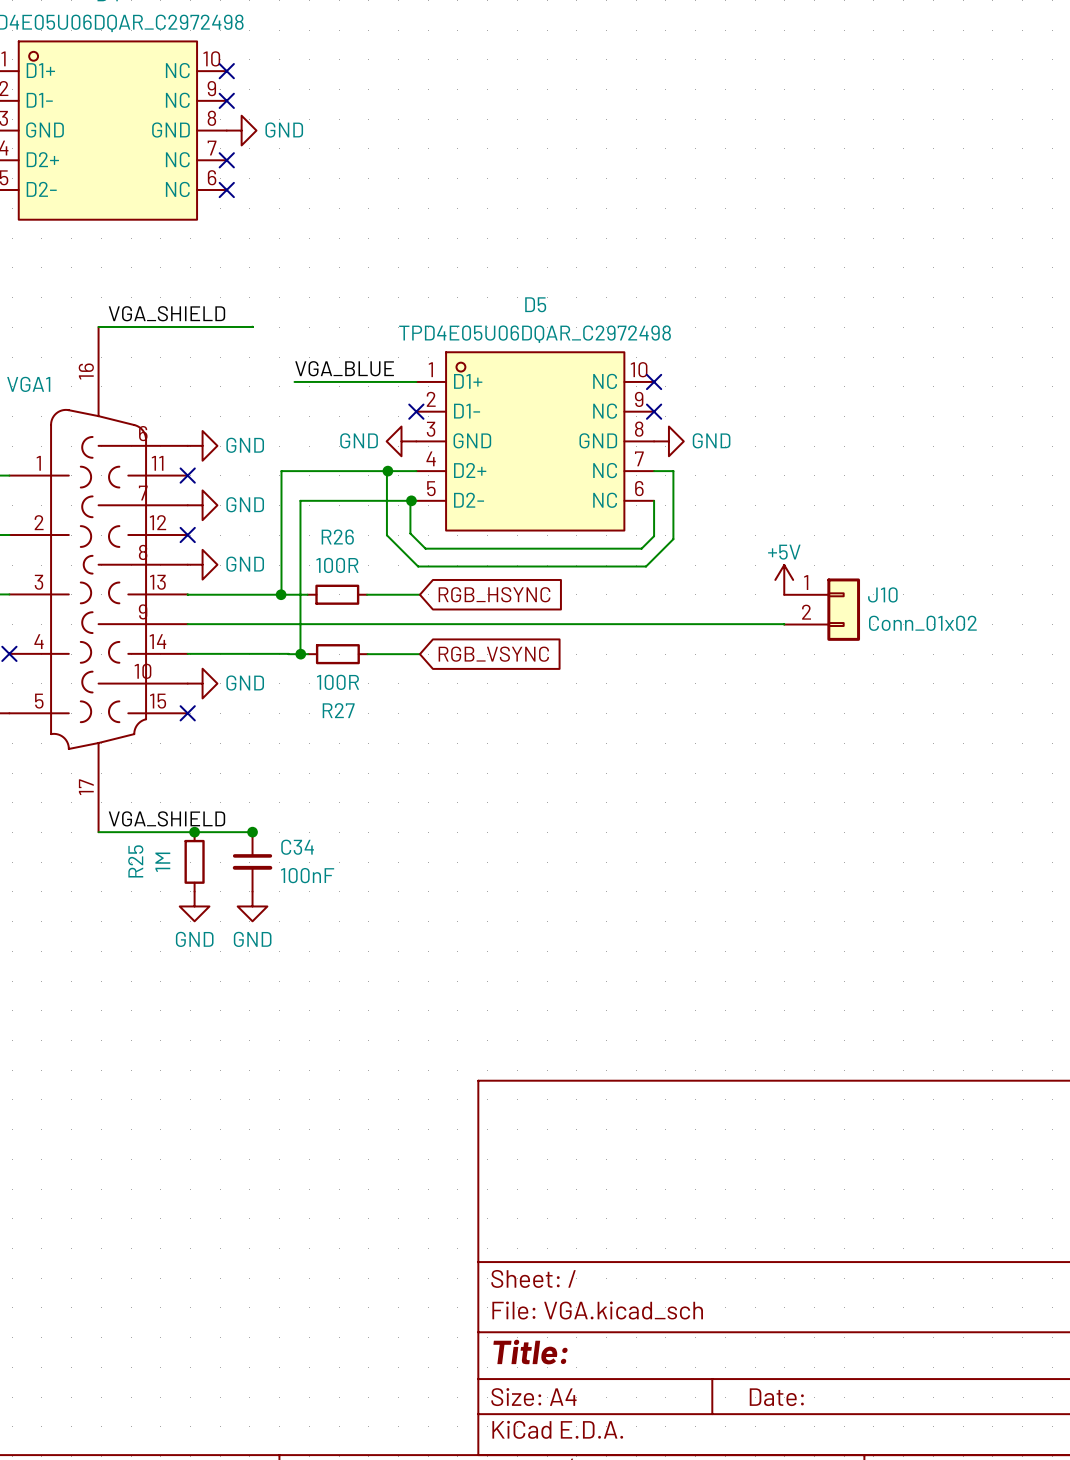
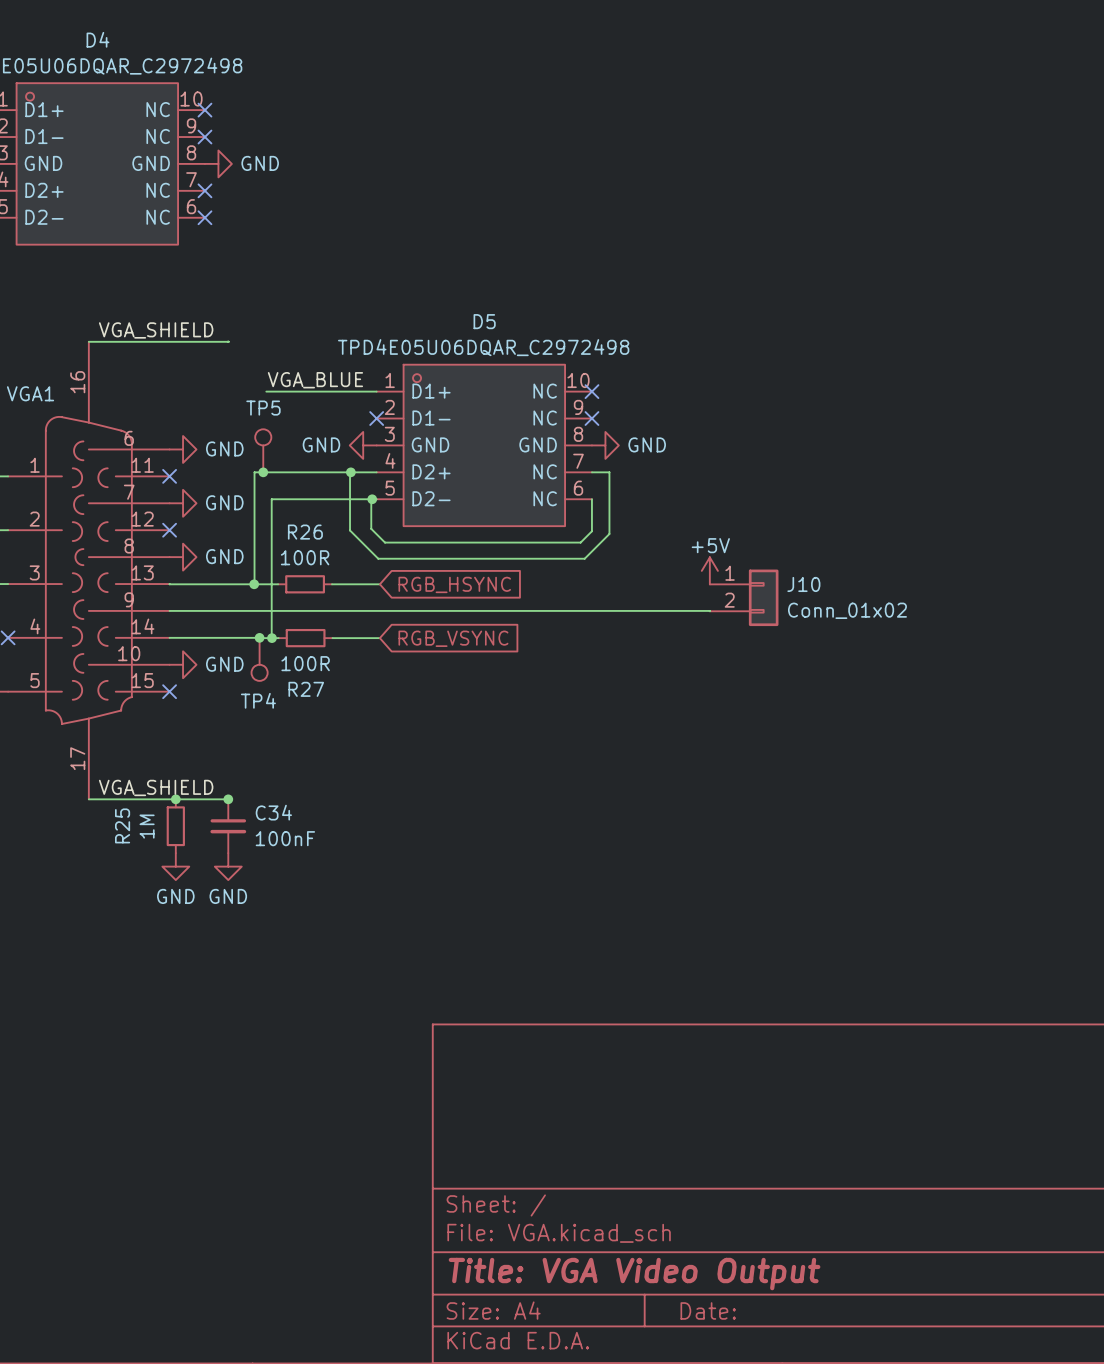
TP5: none -> (263, 450)
junction: none -> (263, 472)
junction: none -> (259, 637)
TP4: none -> (259, 659)
title block: Title: (530, 1352) -> Title: VGA Video Output (634, 1274)

